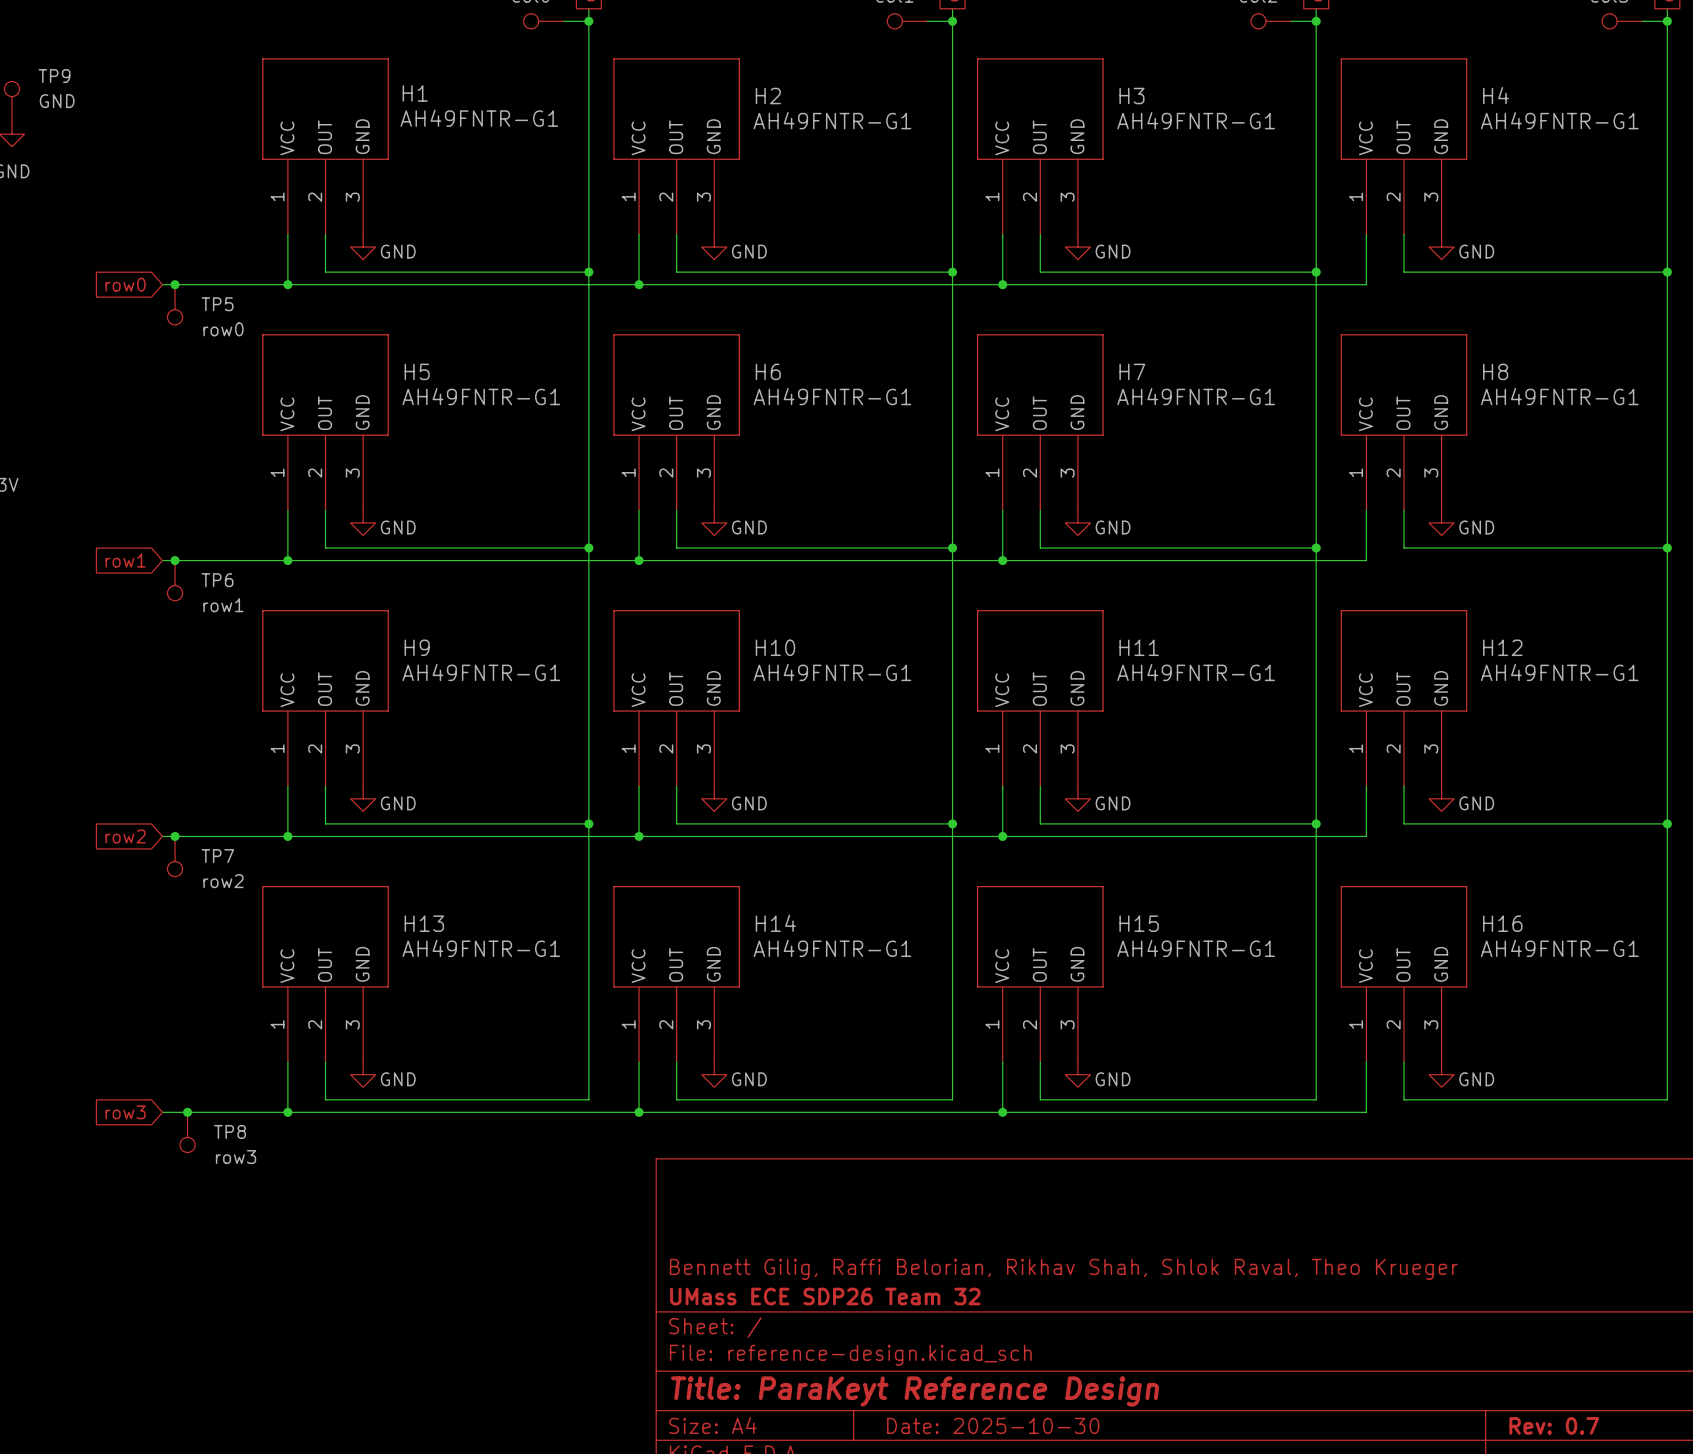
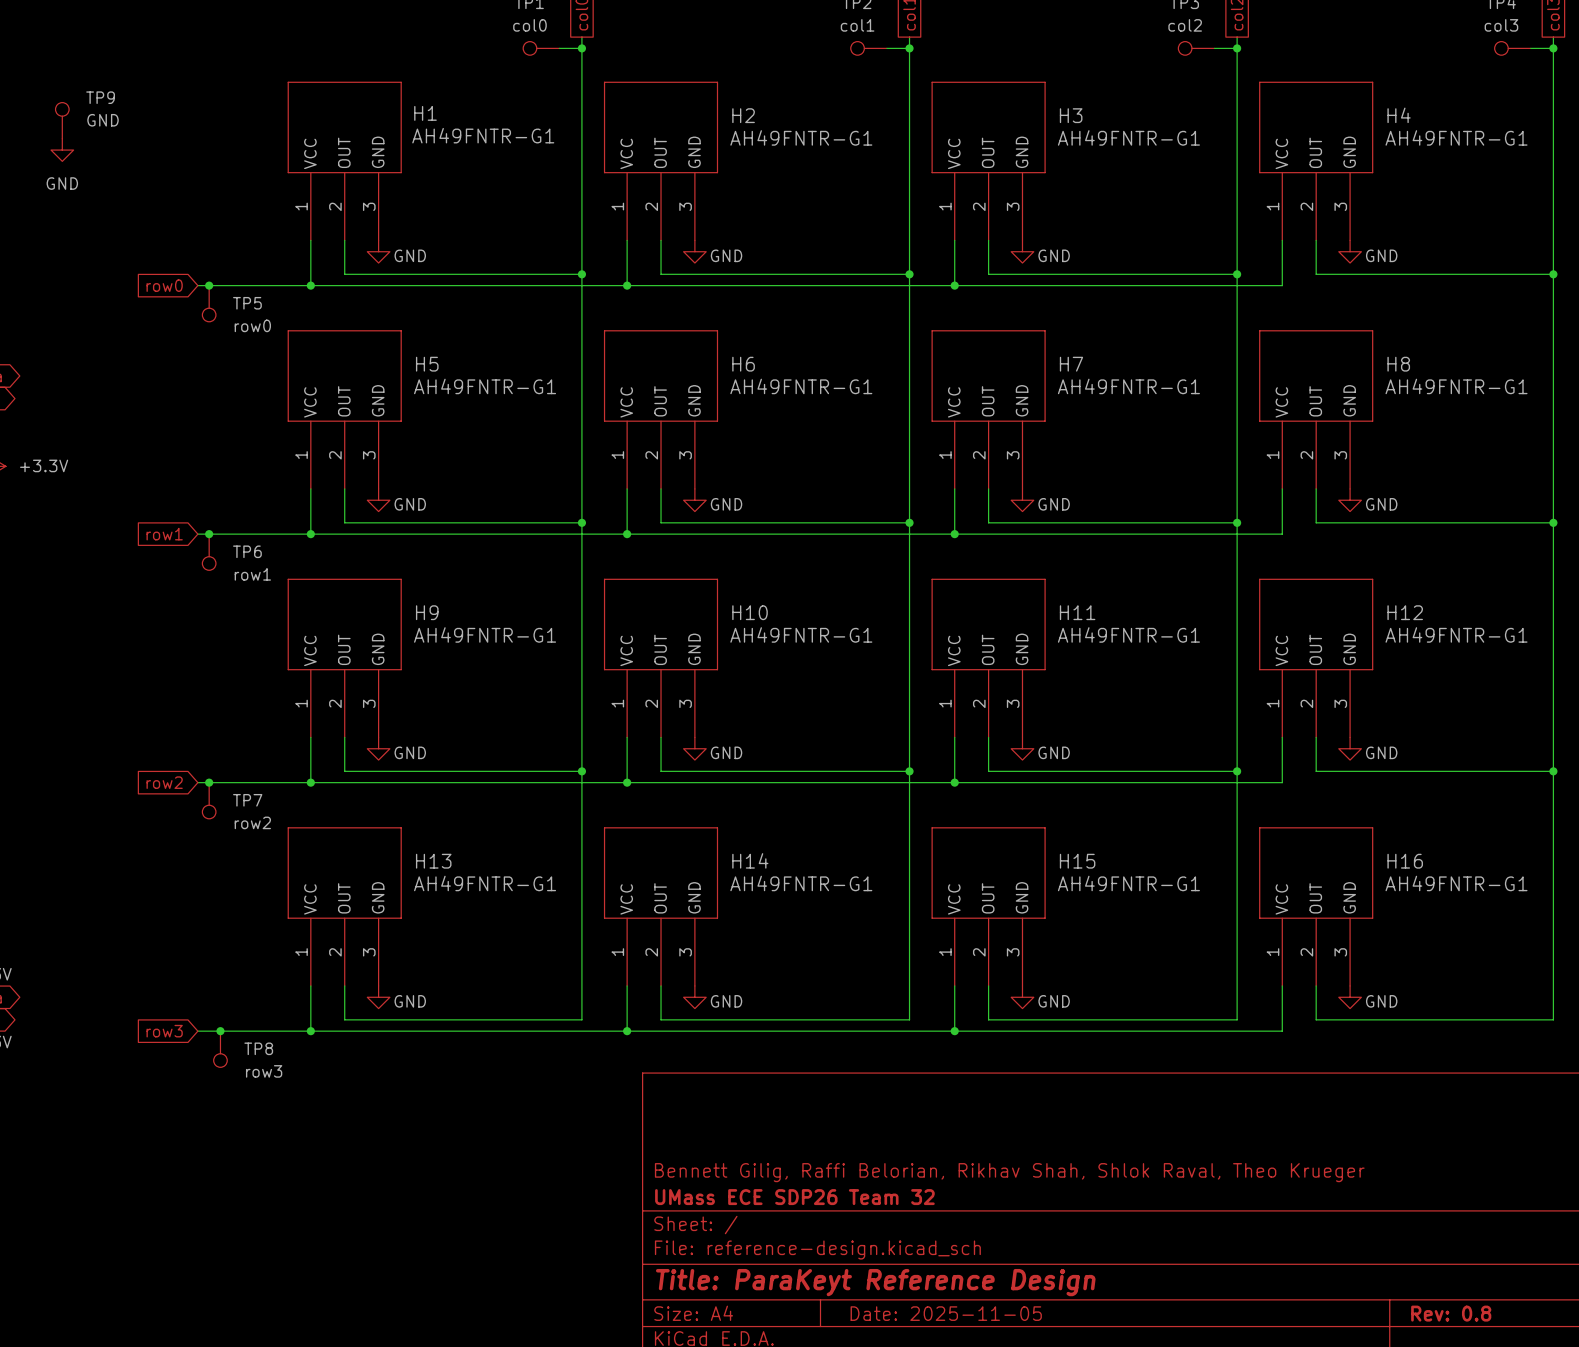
title block: Date: 2025-10-30 (993, 1425) -> Date: 2025-11-05 (946, 1313)
title block: Rev: 0.7 (1554, 1425) -> Rev: 0.8 (1451, 1313)

